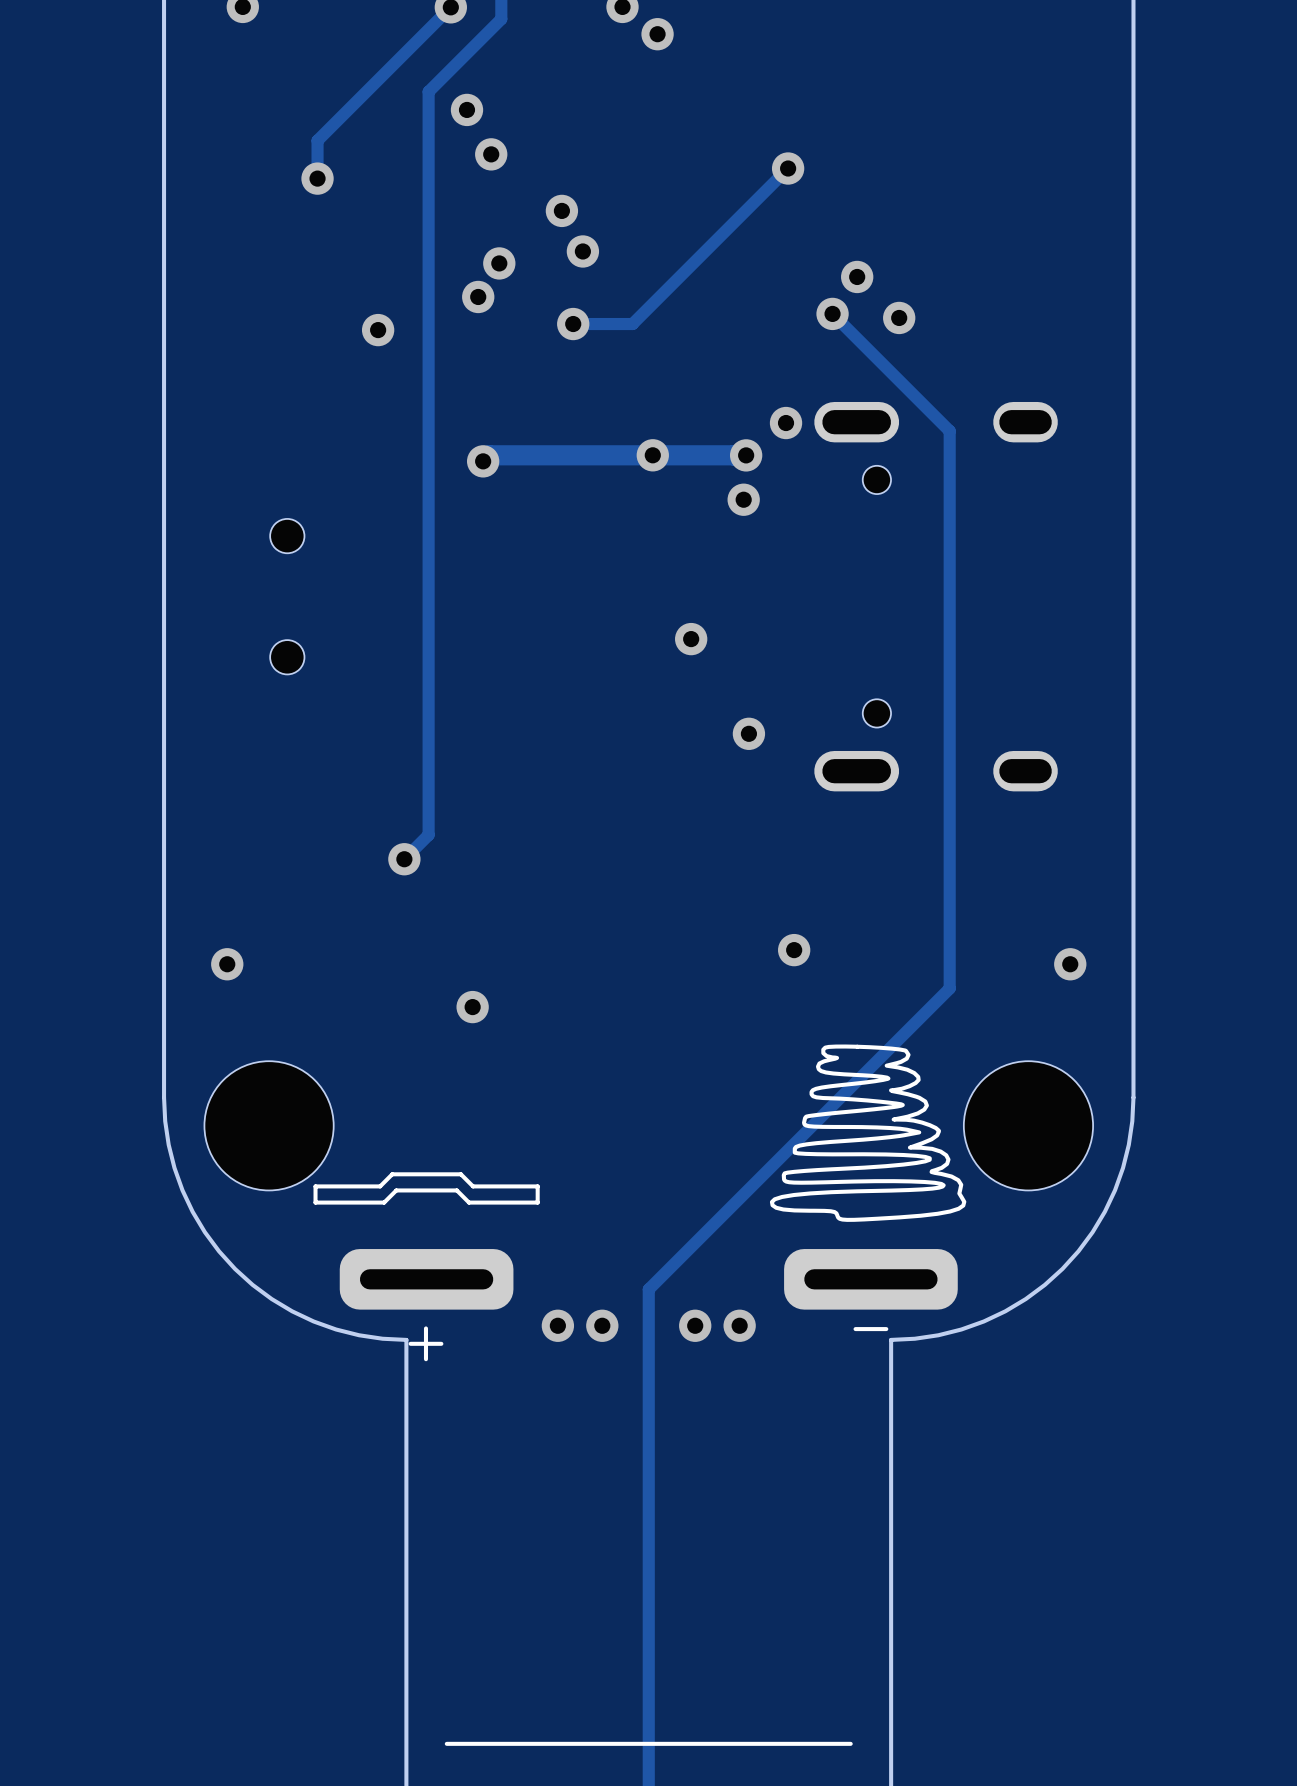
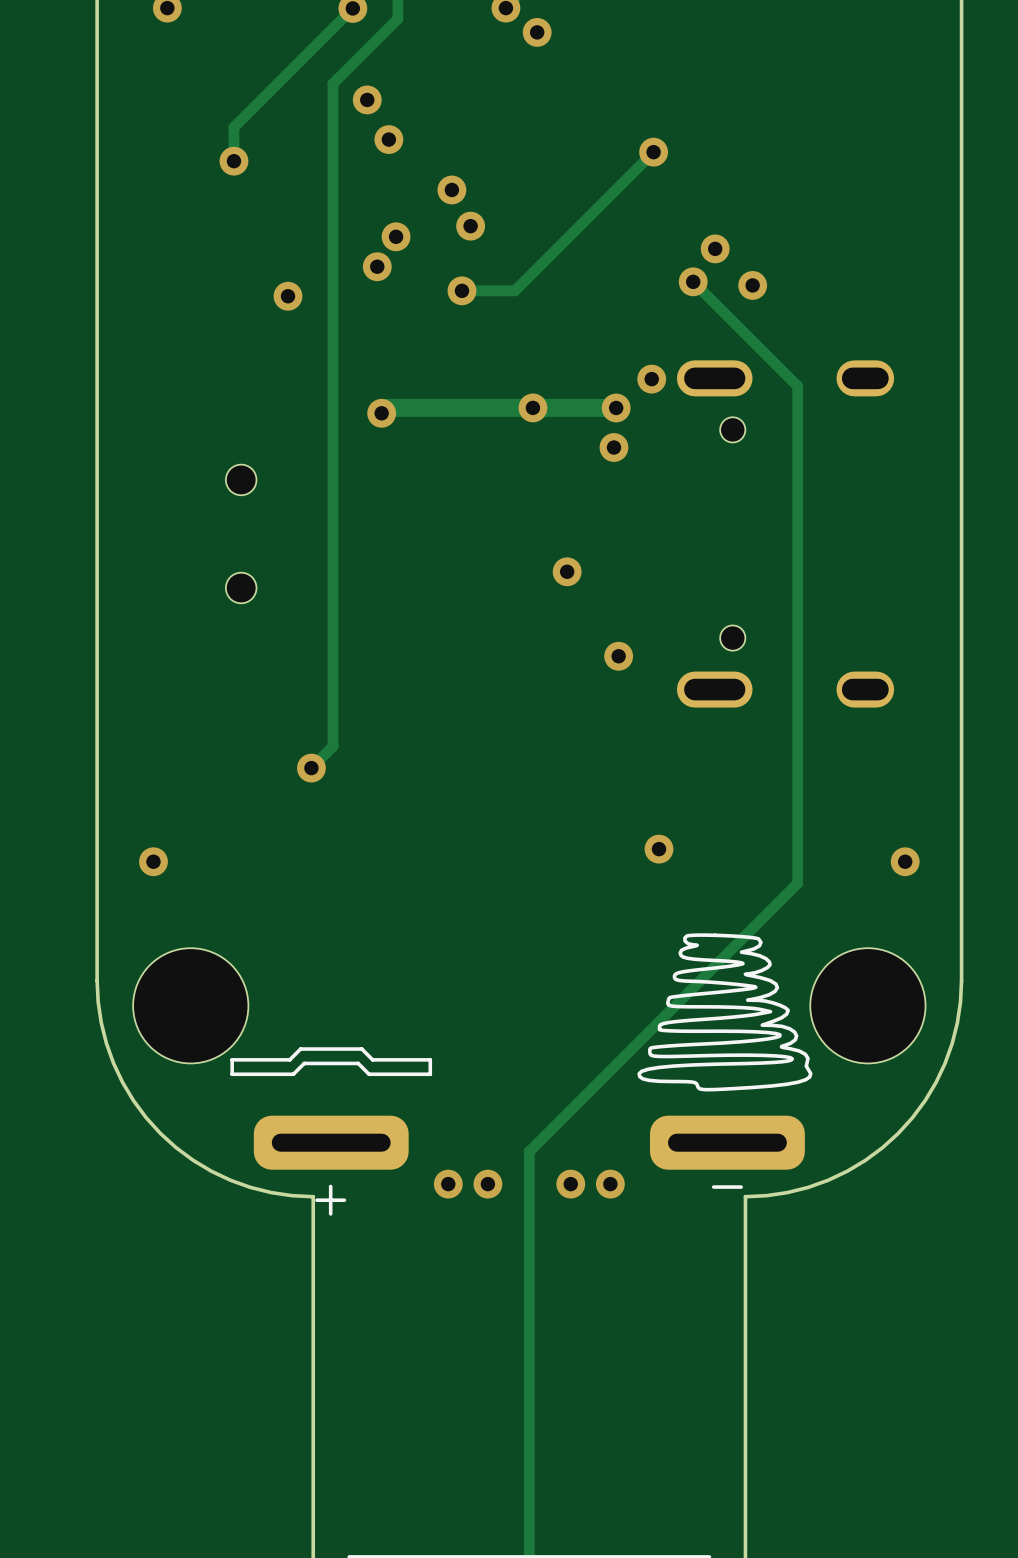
part position: (287, 596) -> (241, 533)
via: (472, 1007) -> none

